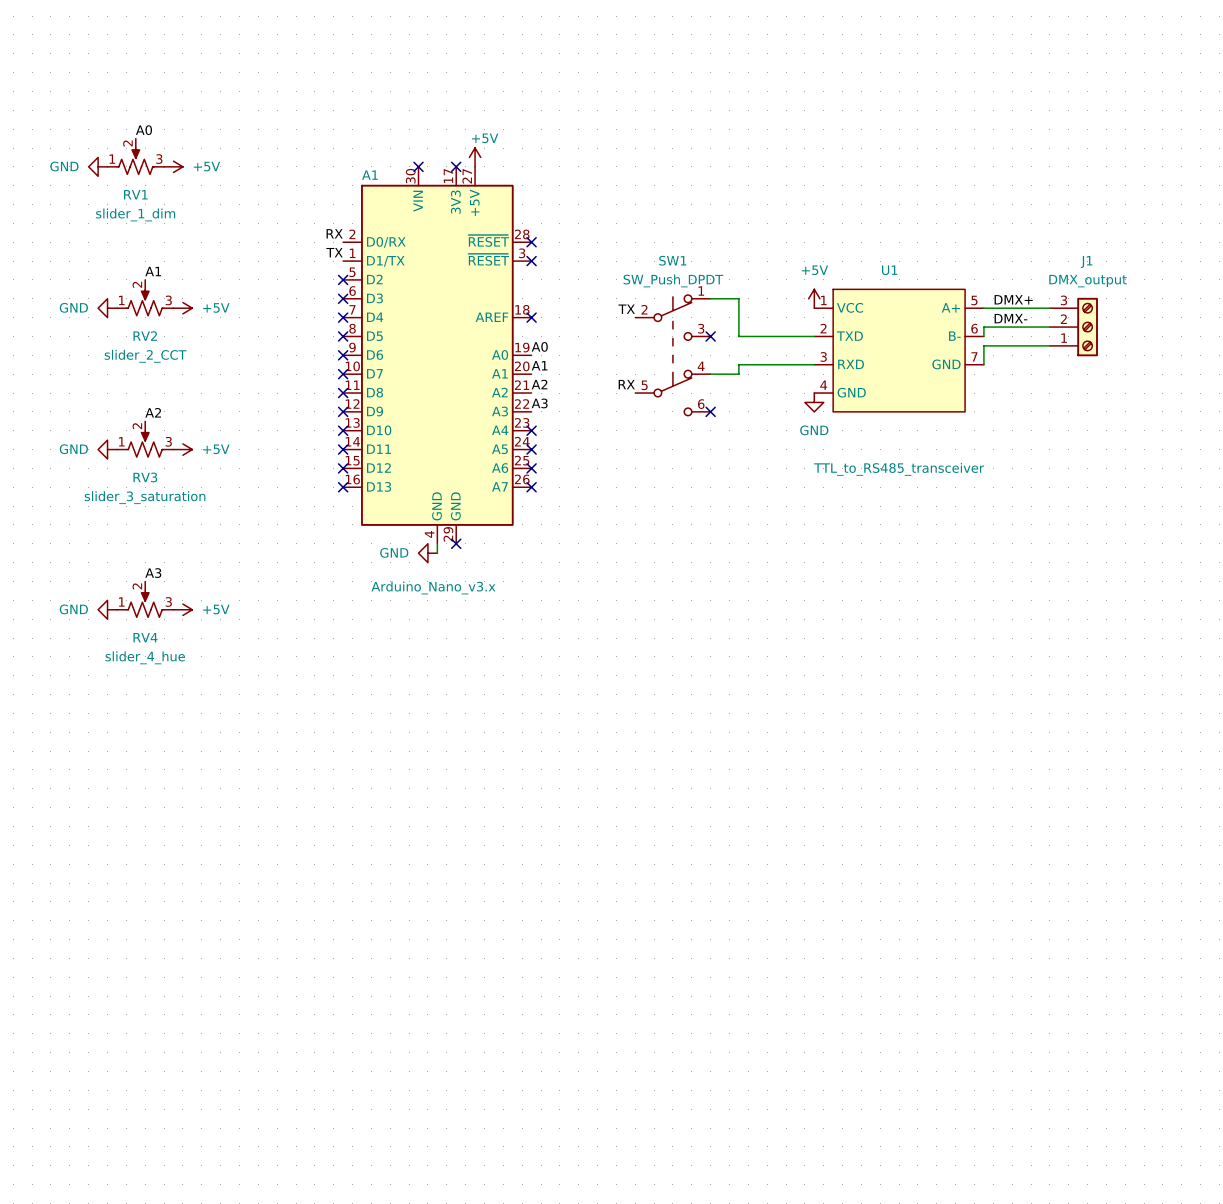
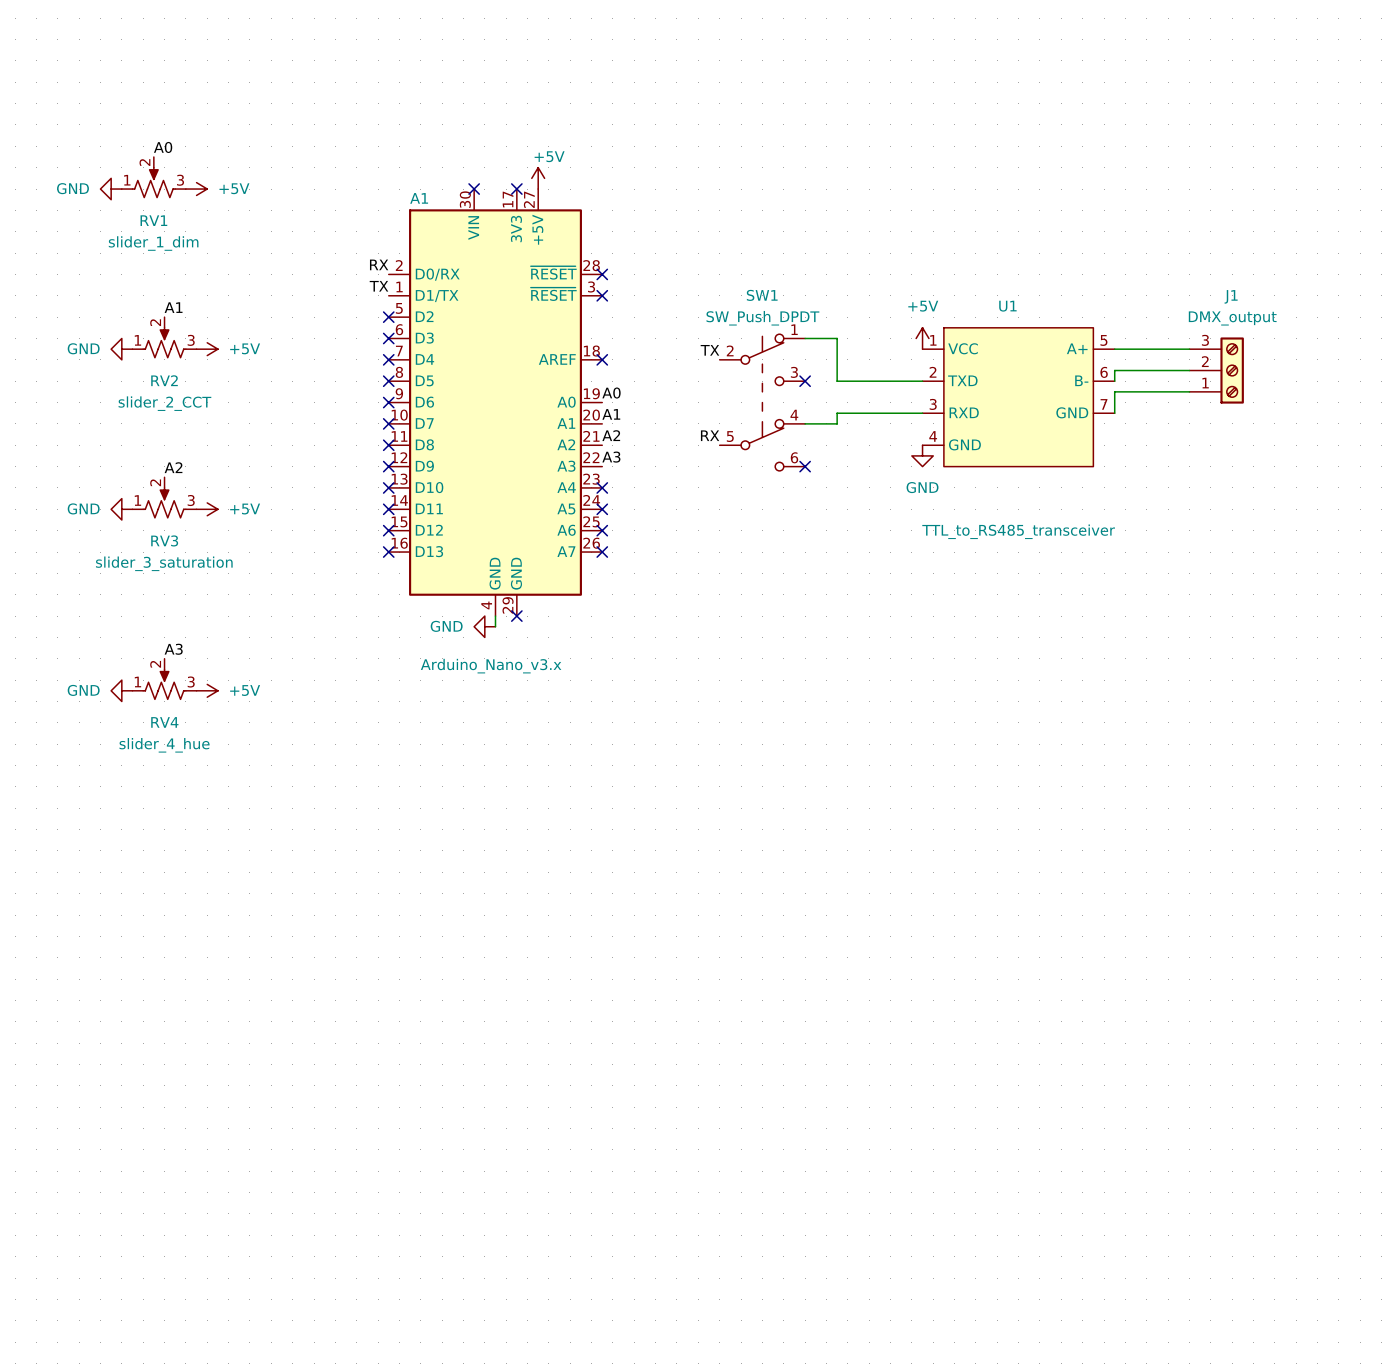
label: DMX+ (1013, 299) -> none
label: DMX- (1010, 318) -> none

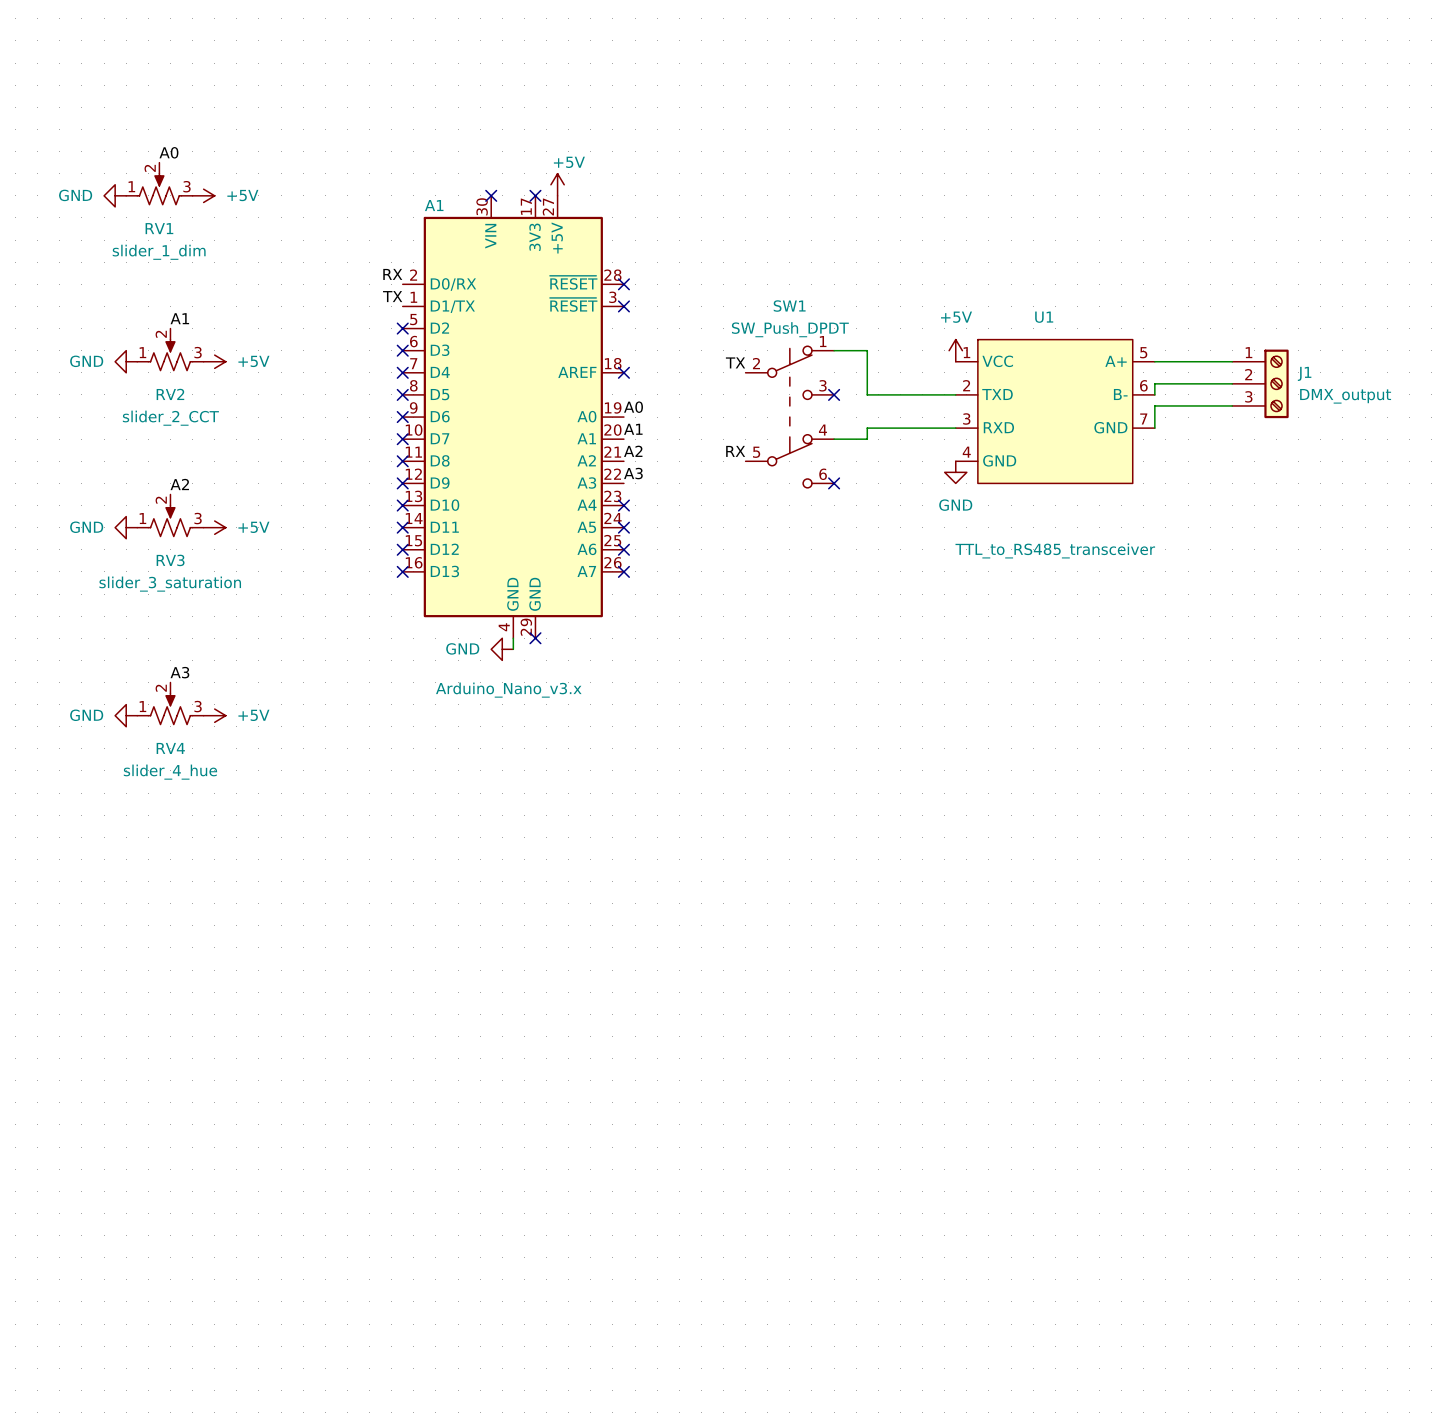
J1 name position: J1 (1231, 296) -> J1 (1304, 373)
J1 value position: DMX_output (1232, 318) -> DMX_output (1345, 396)
J1 flip: as is (1232, 370) -> up-down (1276, 383)

